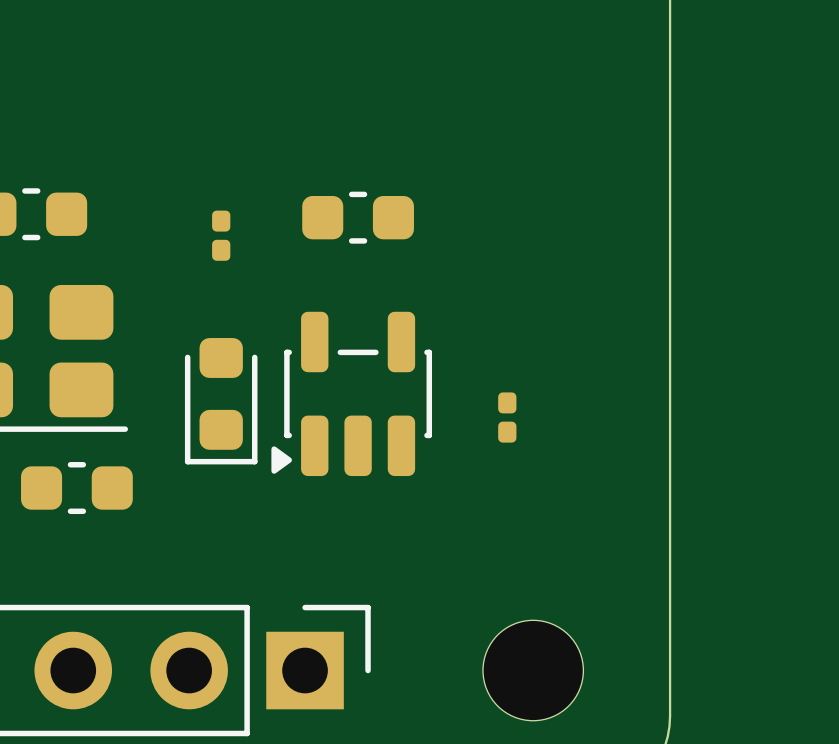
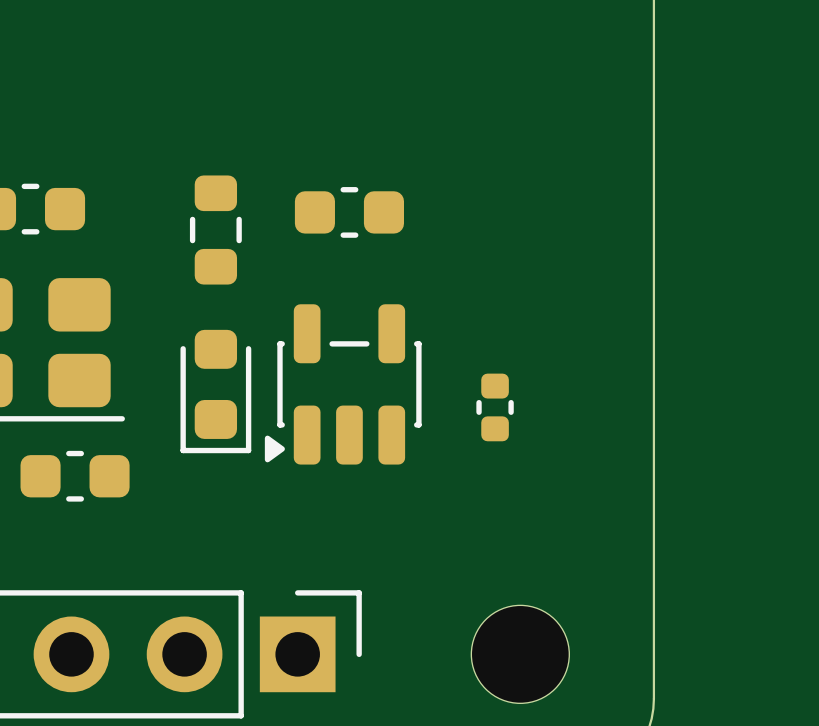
part footprint: [212, 210, 231, 261] -> [189, 175, 242, 285]
part footprint: [498, 392, 517, 443] -> [476, 373, 514, 442]

